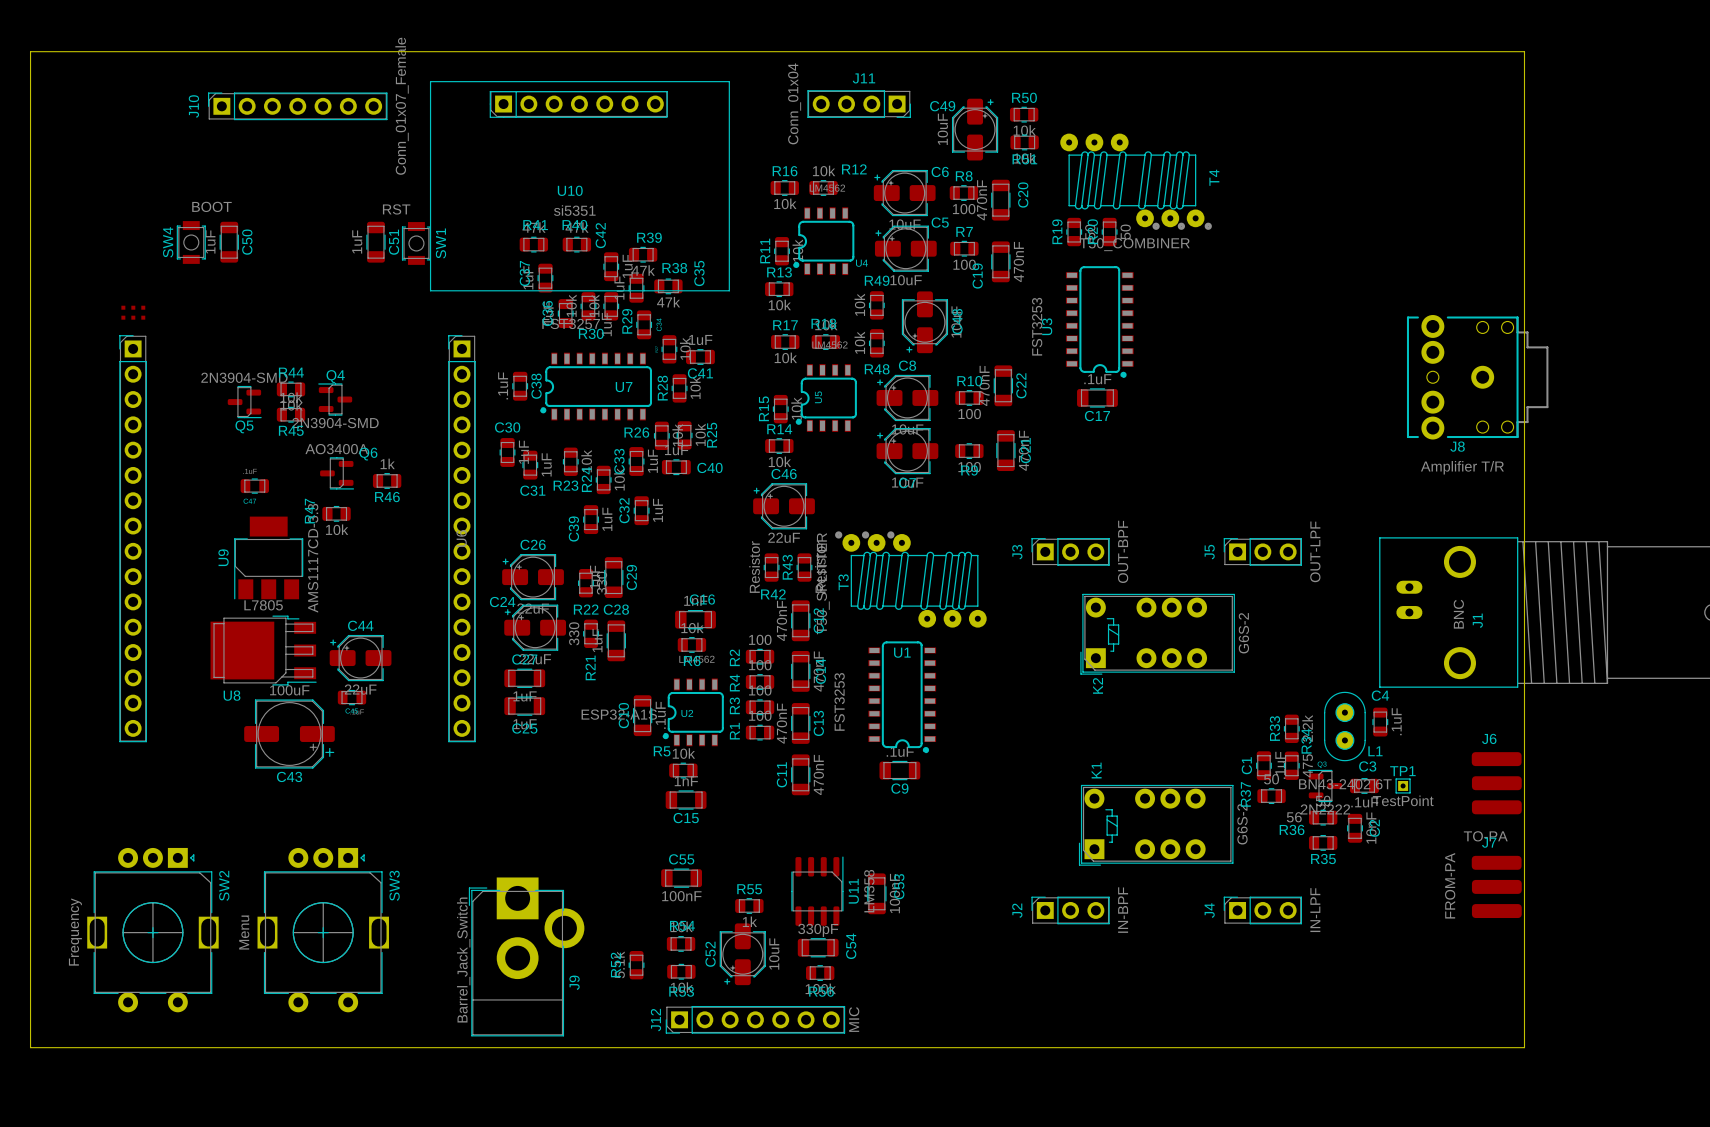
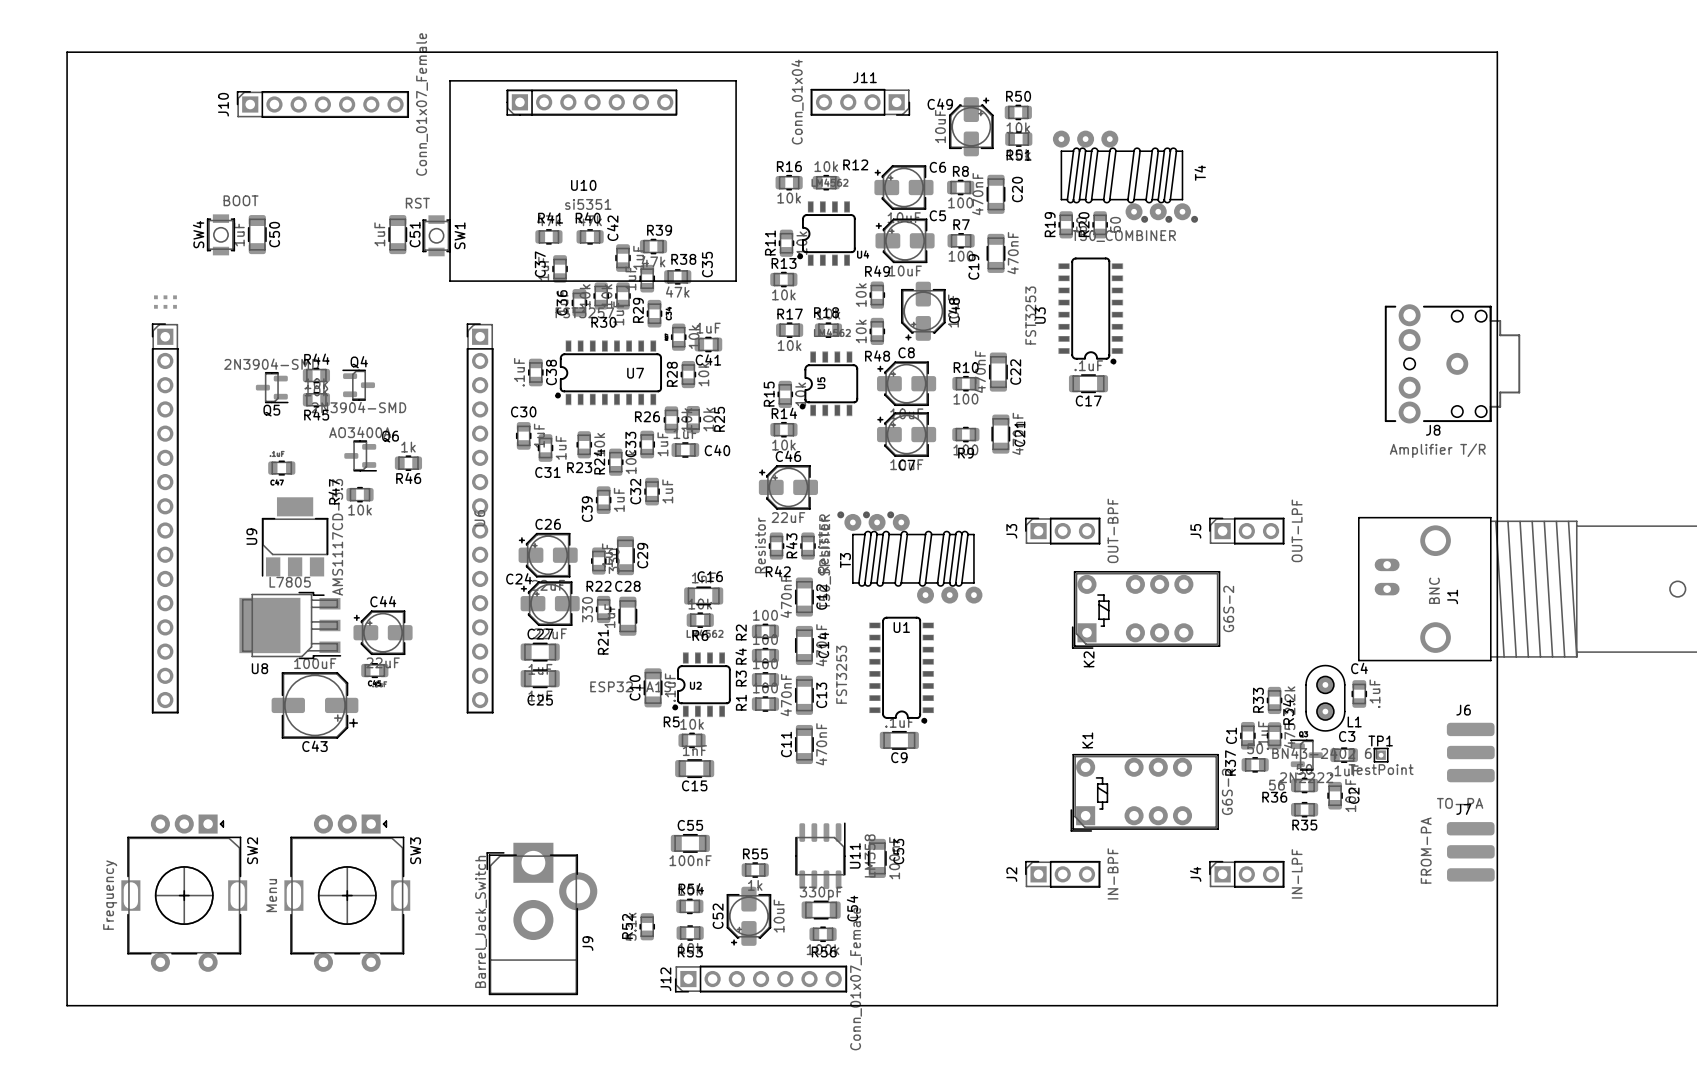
J12 value: MIC (854, 1019) -> Conn_01x07_Female (856, 979)

